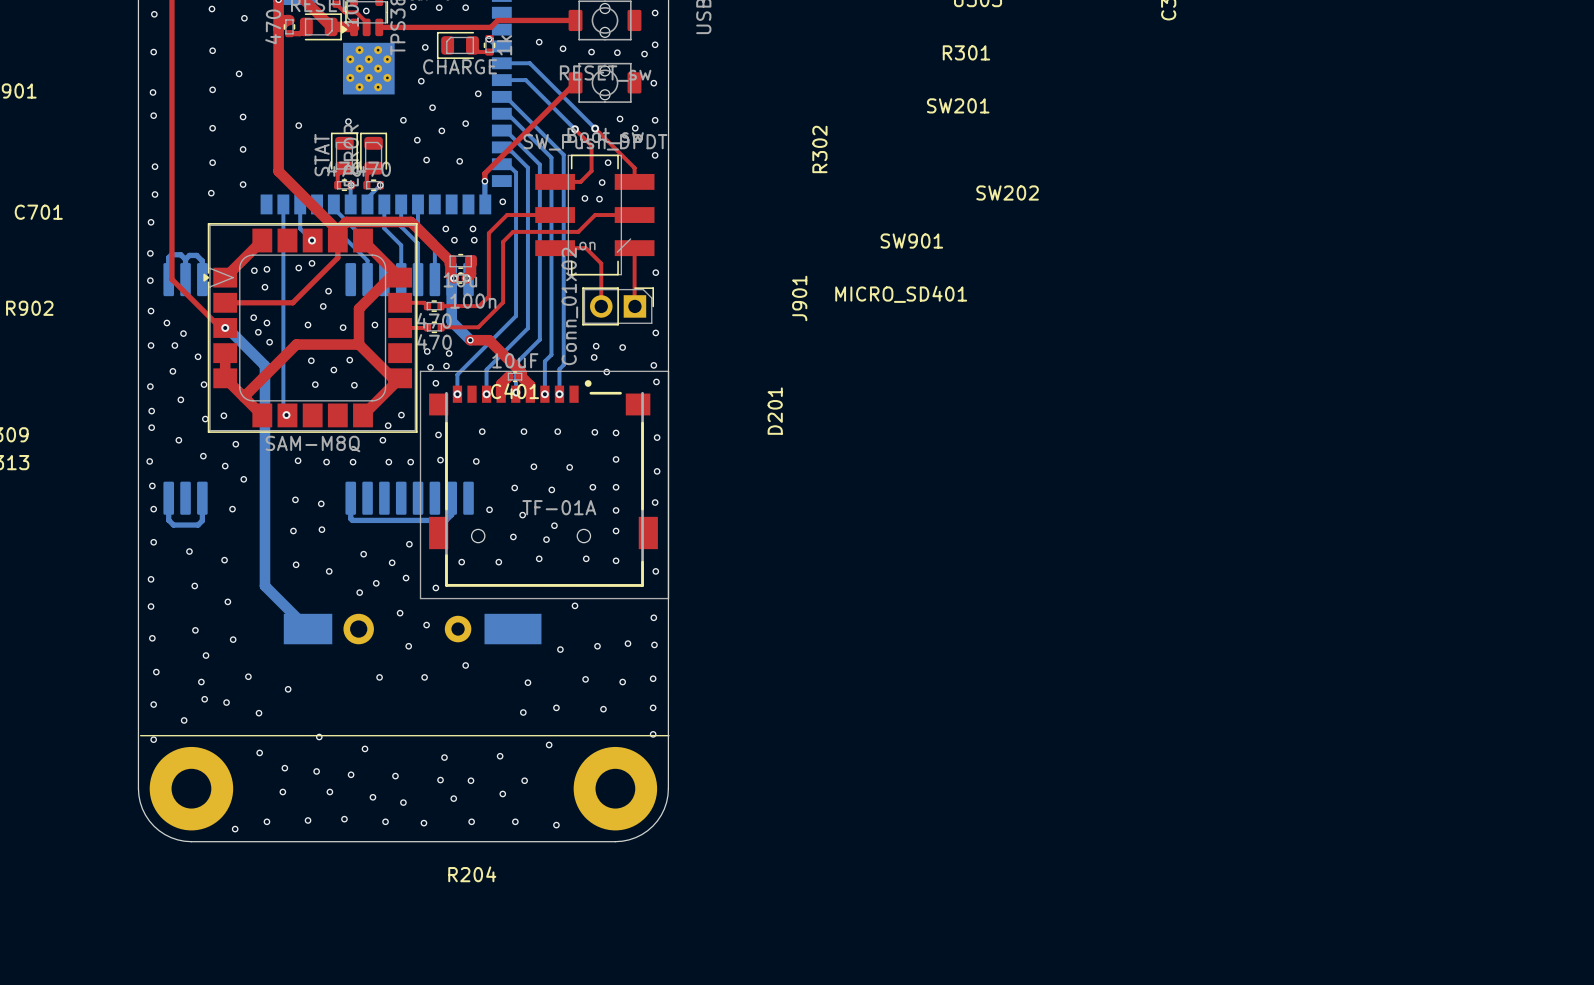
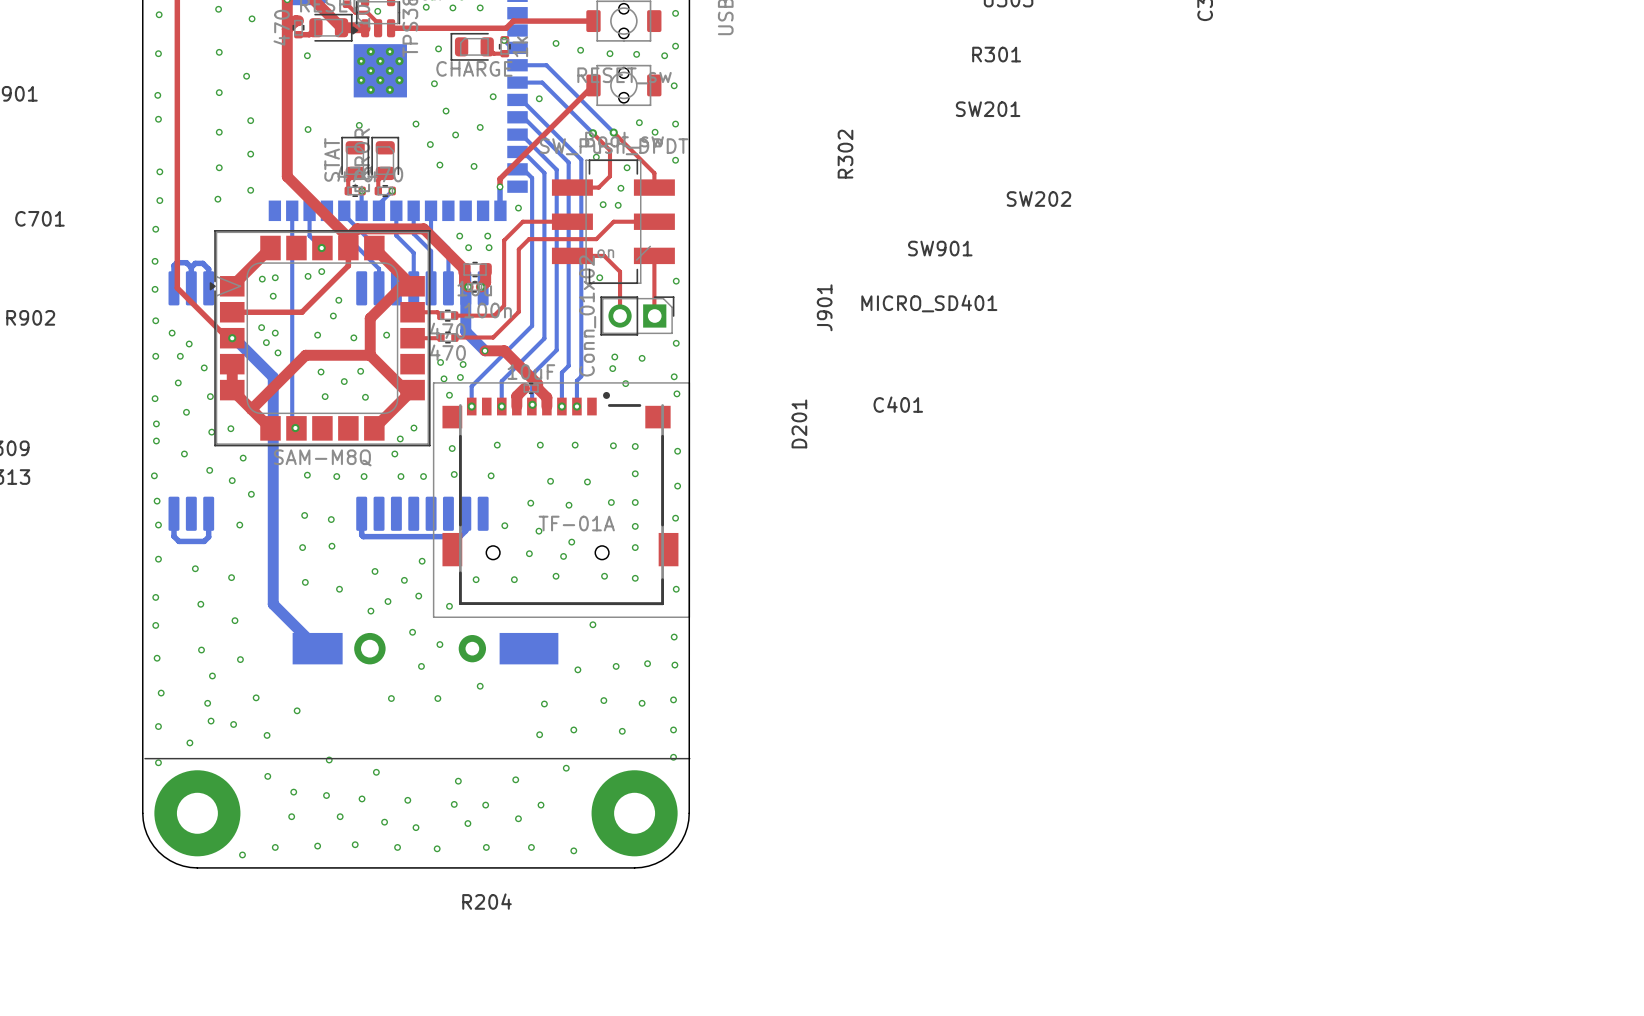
via: none -> (307, 55)
via: none -> (539, 98)
via: none -> (596, 157)
via: none -> (599, 277)
C401 name position: C401 (515, 391) -> C401 (898, 404)

